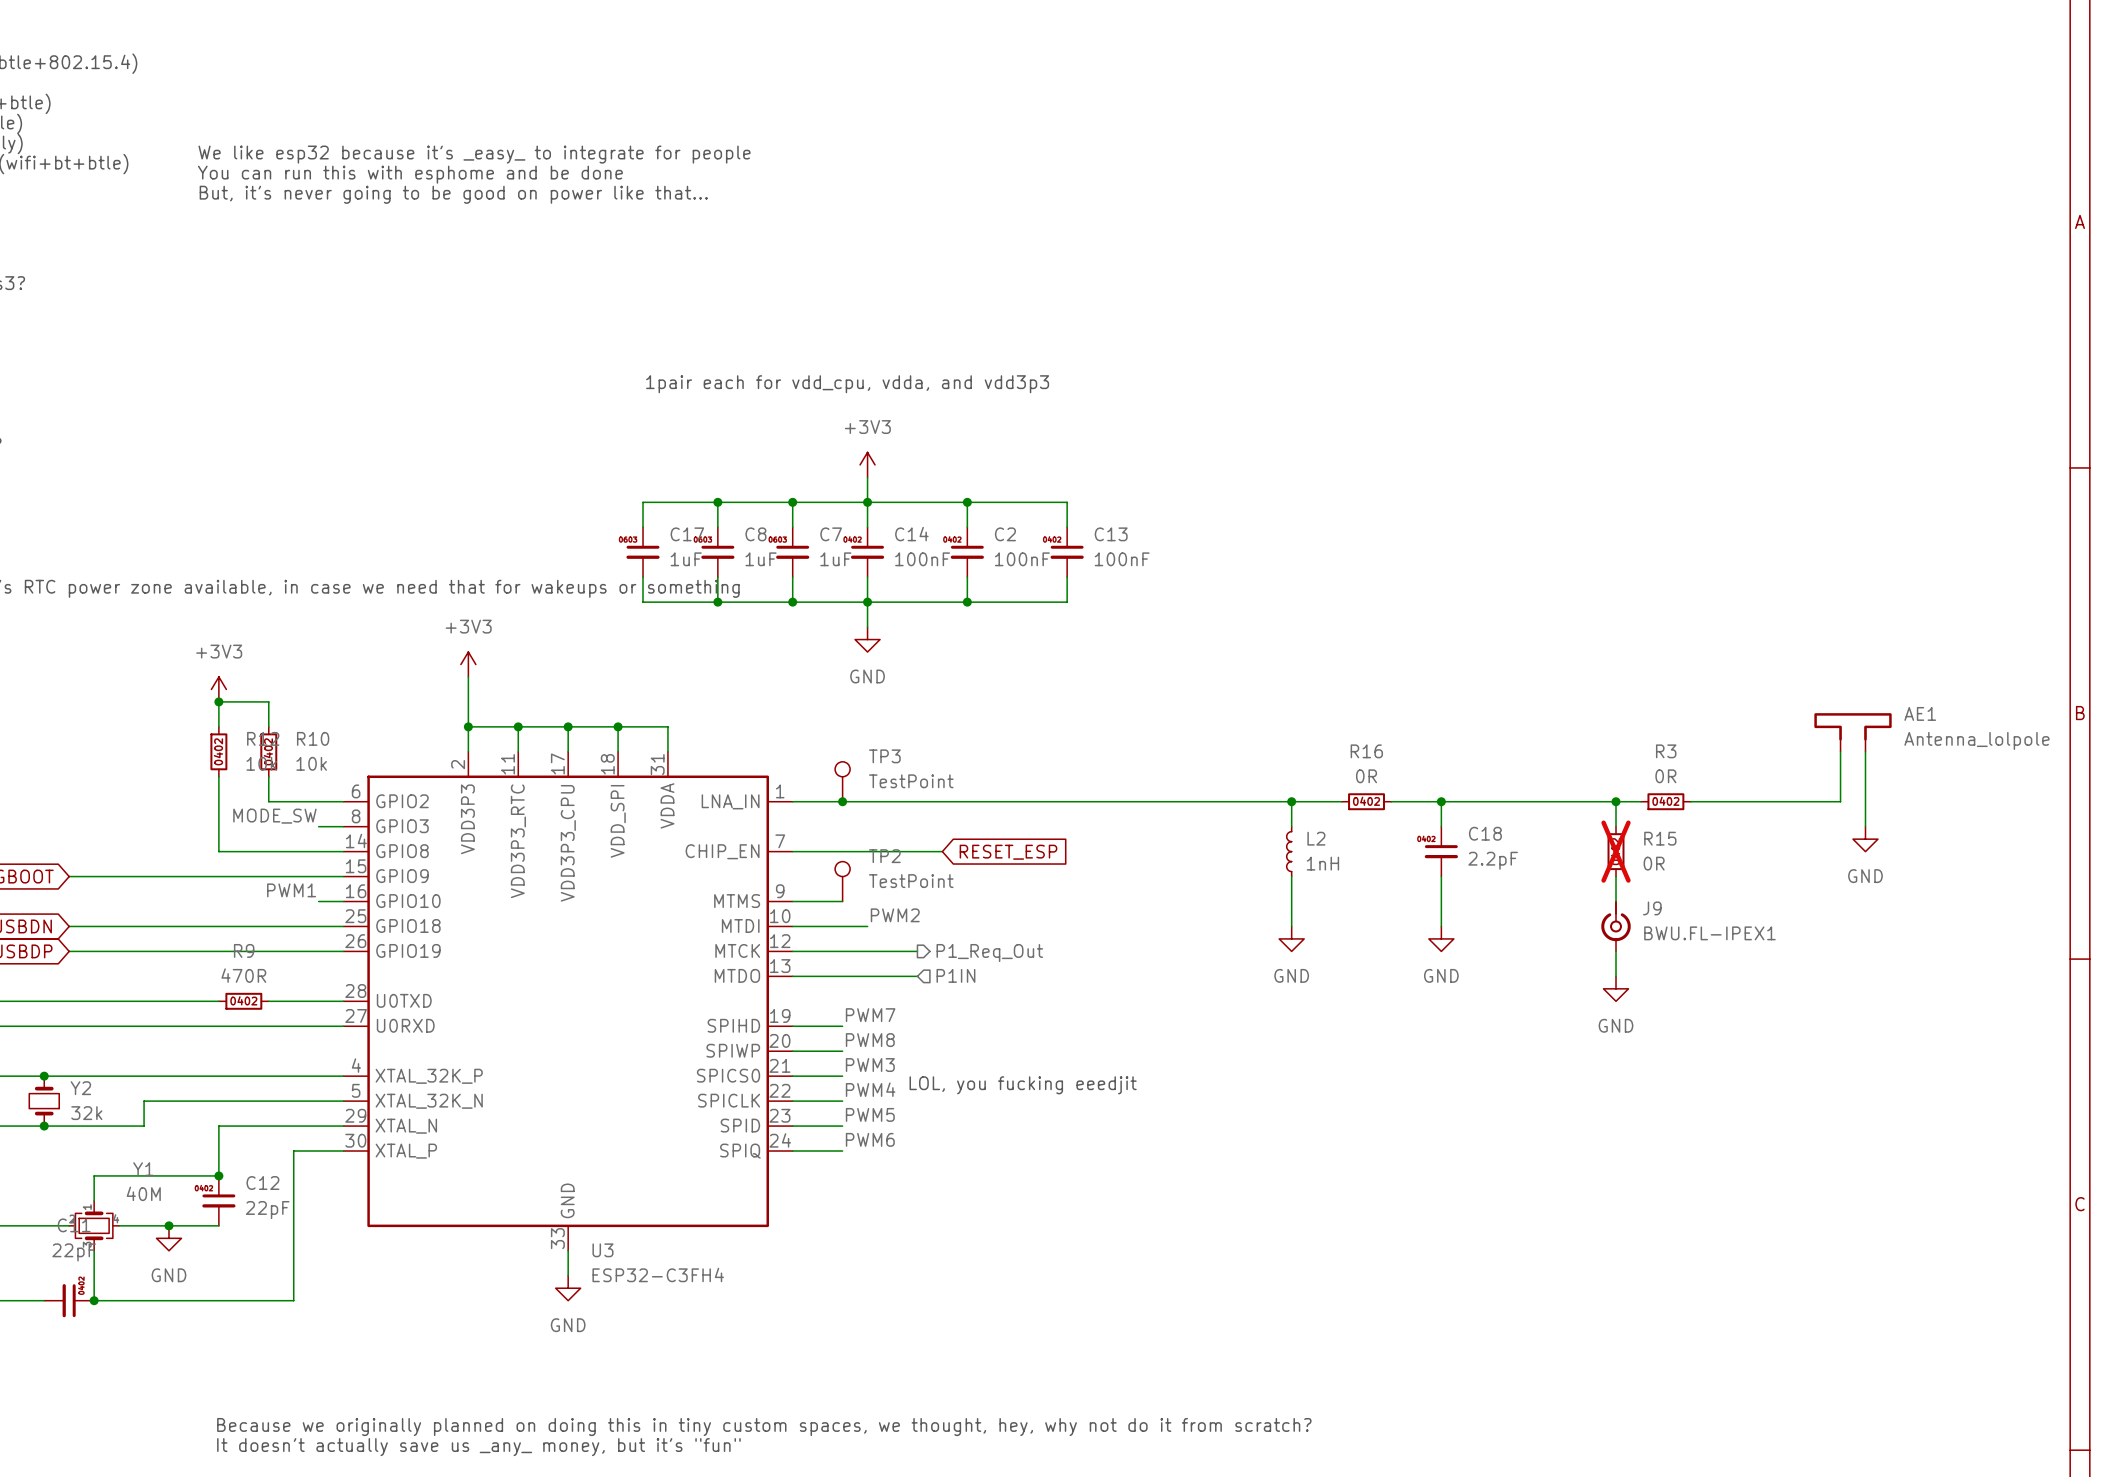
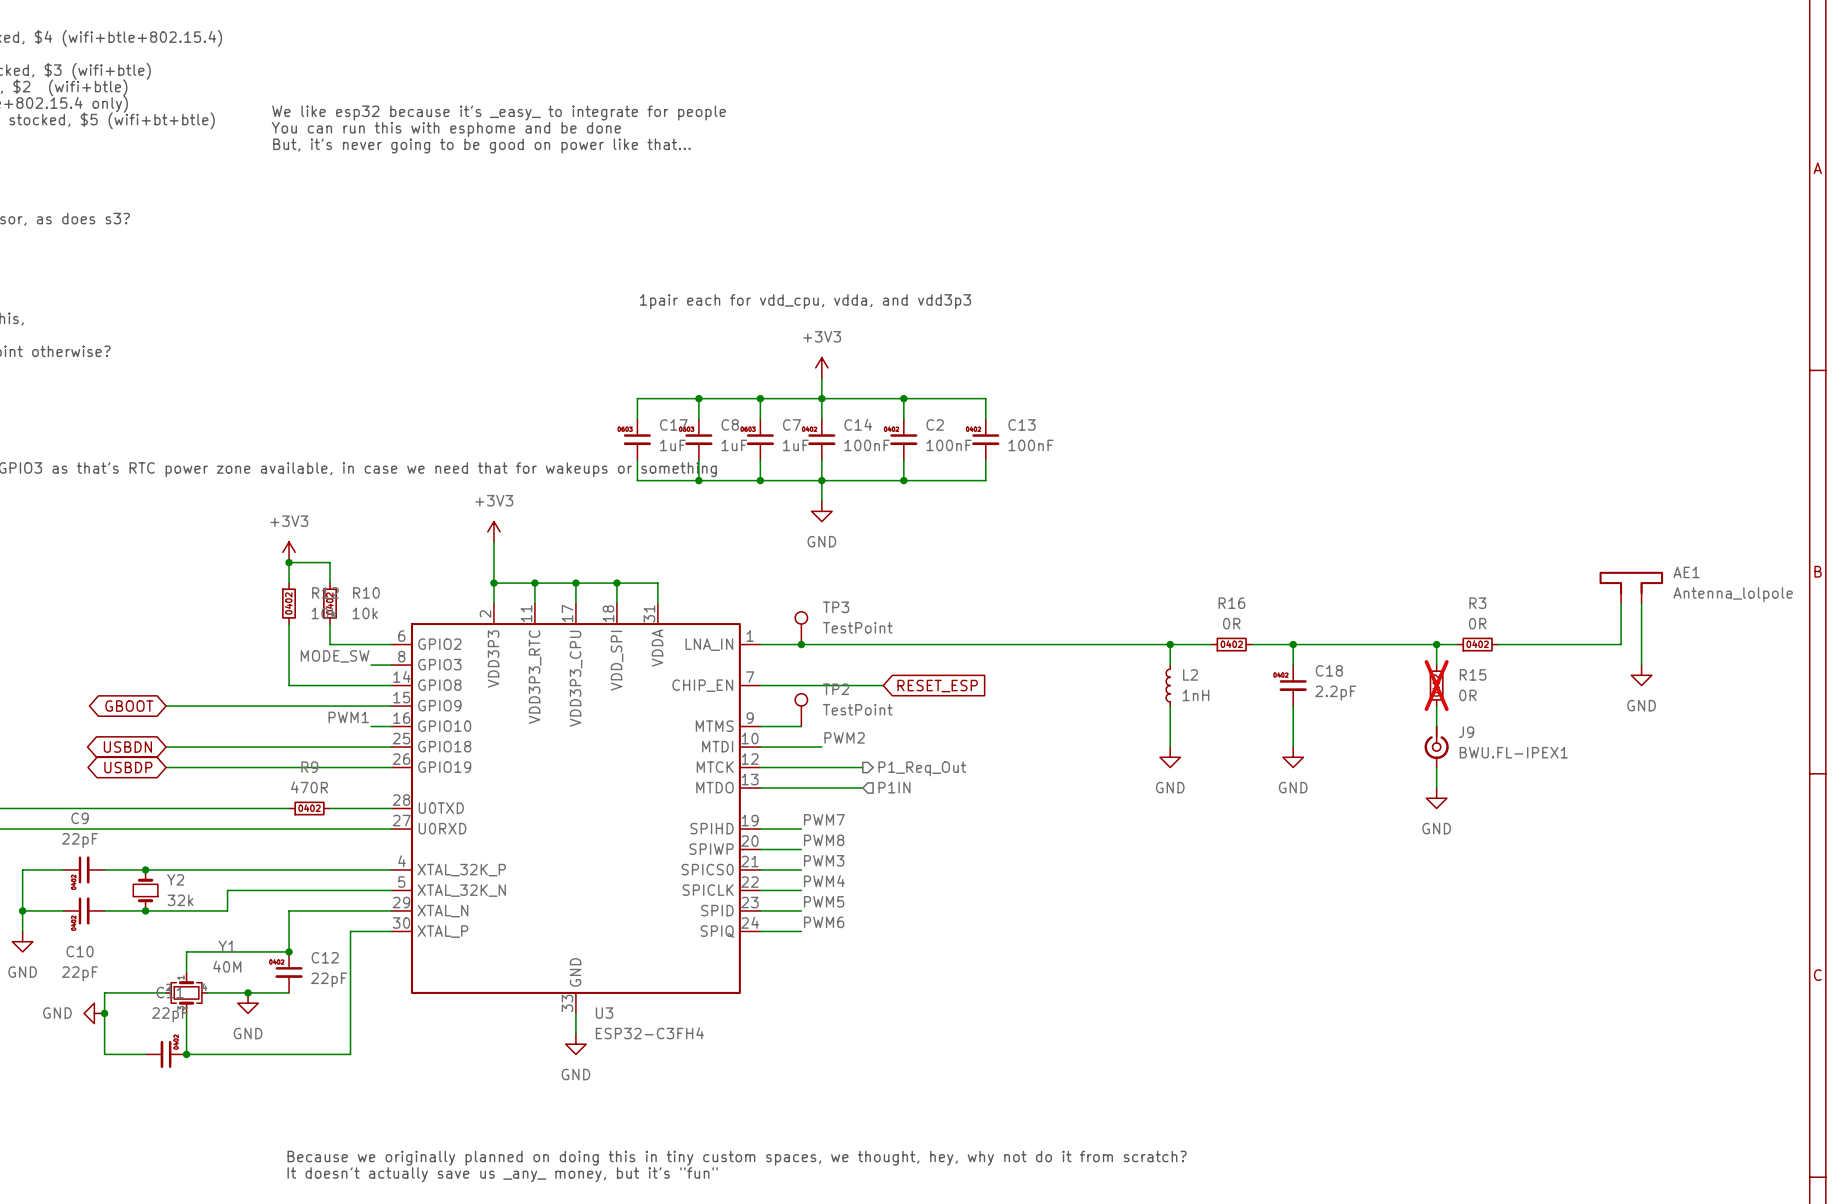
text: LOL, you fucking eeedjit (1023, 1085) -> none

